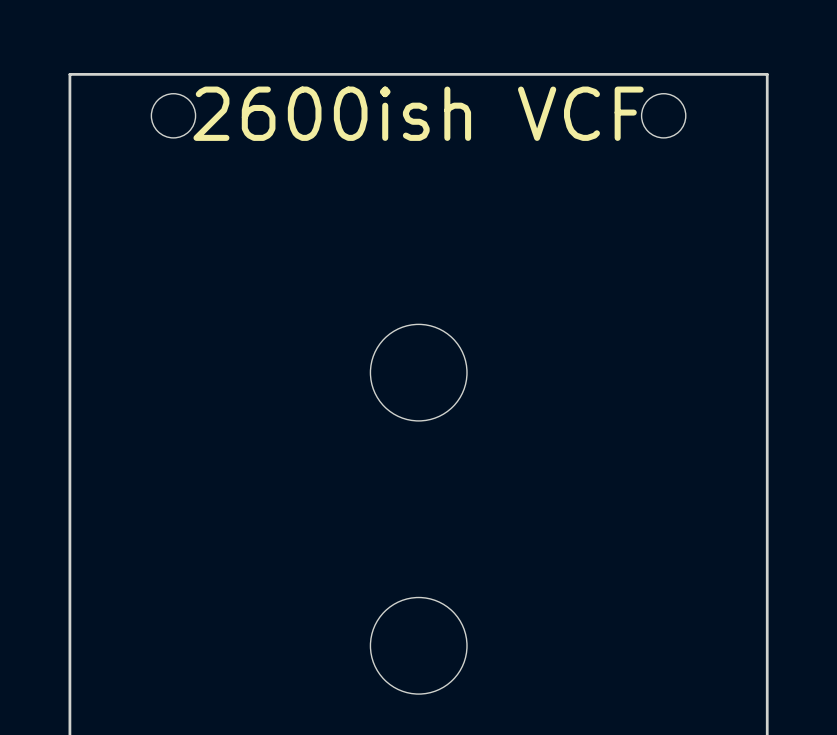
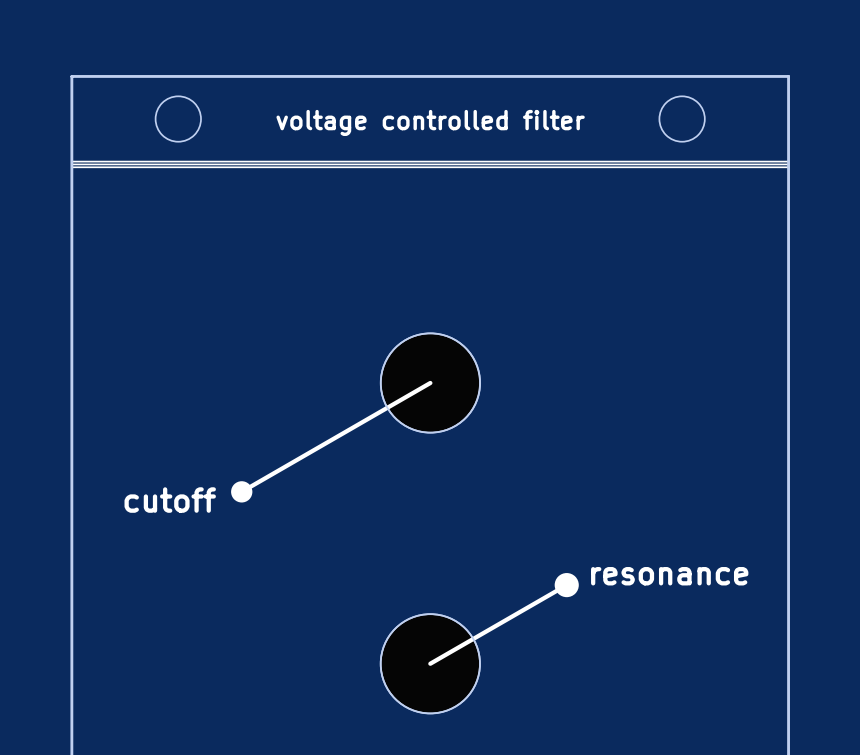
text: 2600ish VCF (418, 113) -> voltage controlled filter (430, 122)
line: none -> (71, 161) (788, 161)
line: none -> (71, 164) (788, 164)
line: none -> (71, 167) (788, 167)
line: none -> (430, 383) (241, 491)
part: none -> (430, 383)
drawing: none -> [231, 481, 253, 503]
text: none -> cutoff (170, 500)
drawing: none -> [554, 573, 579, 598]
text: none -> resonance (669, 576)
line: none -> (566, 585) (430, 663)
part: none -> (430, 663)

